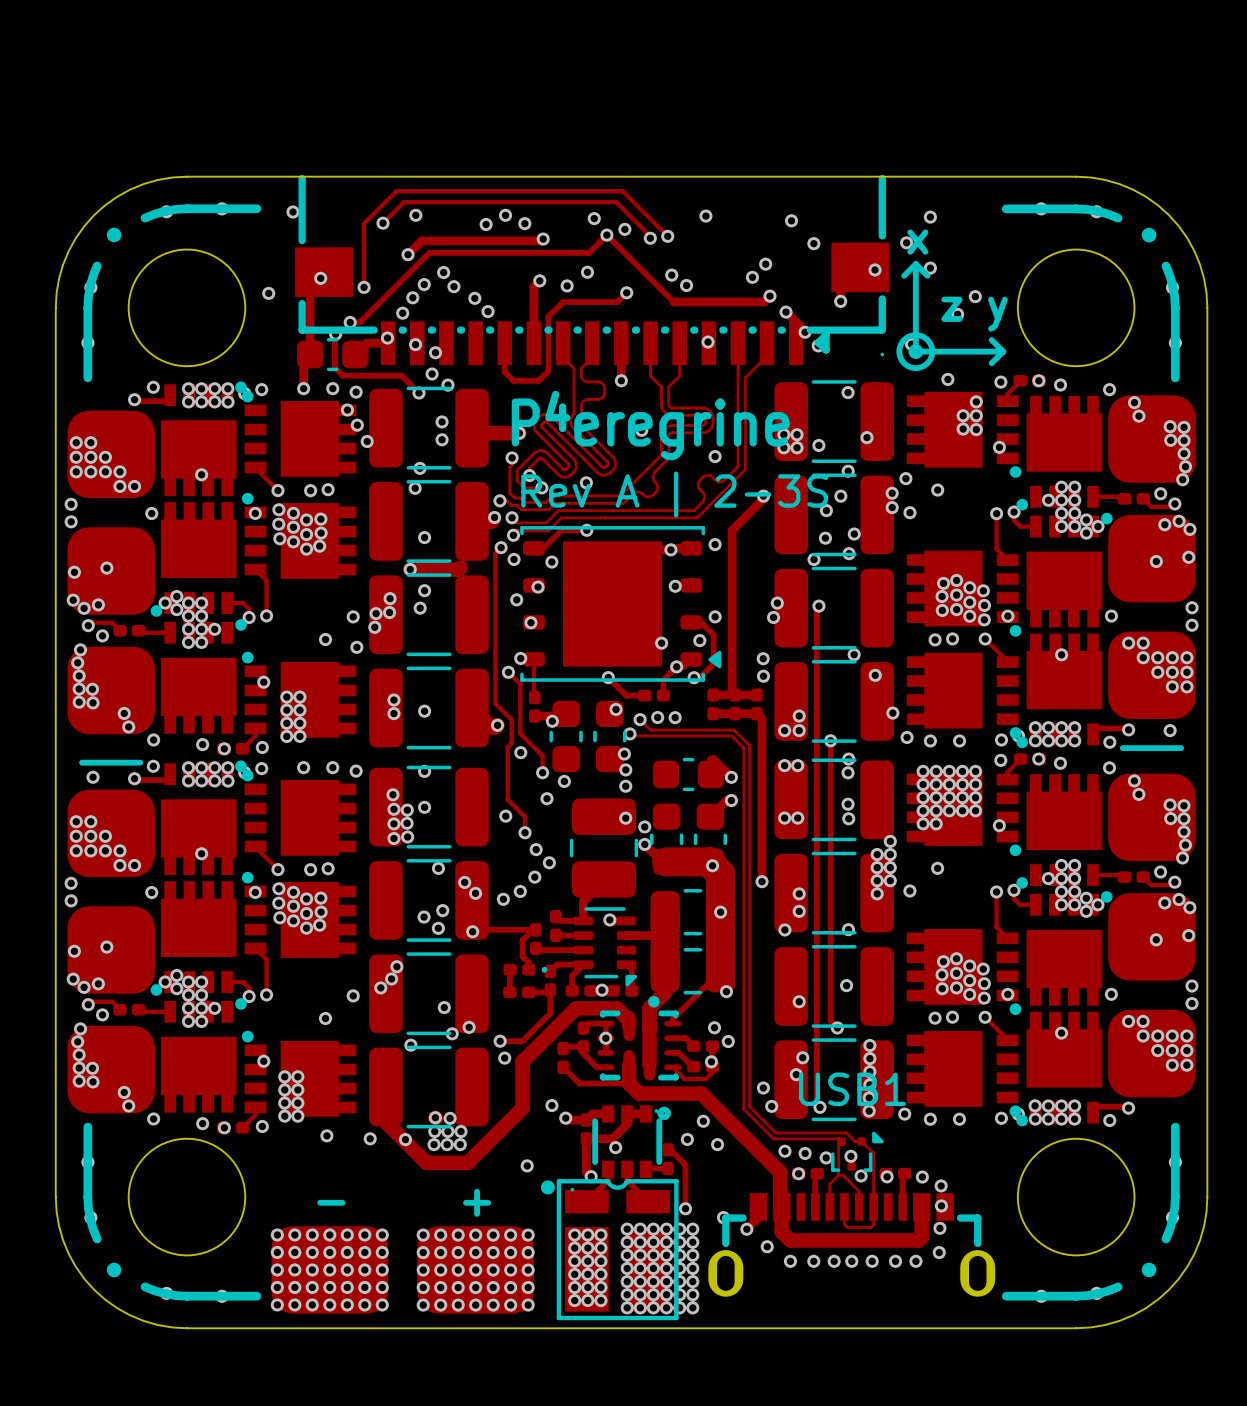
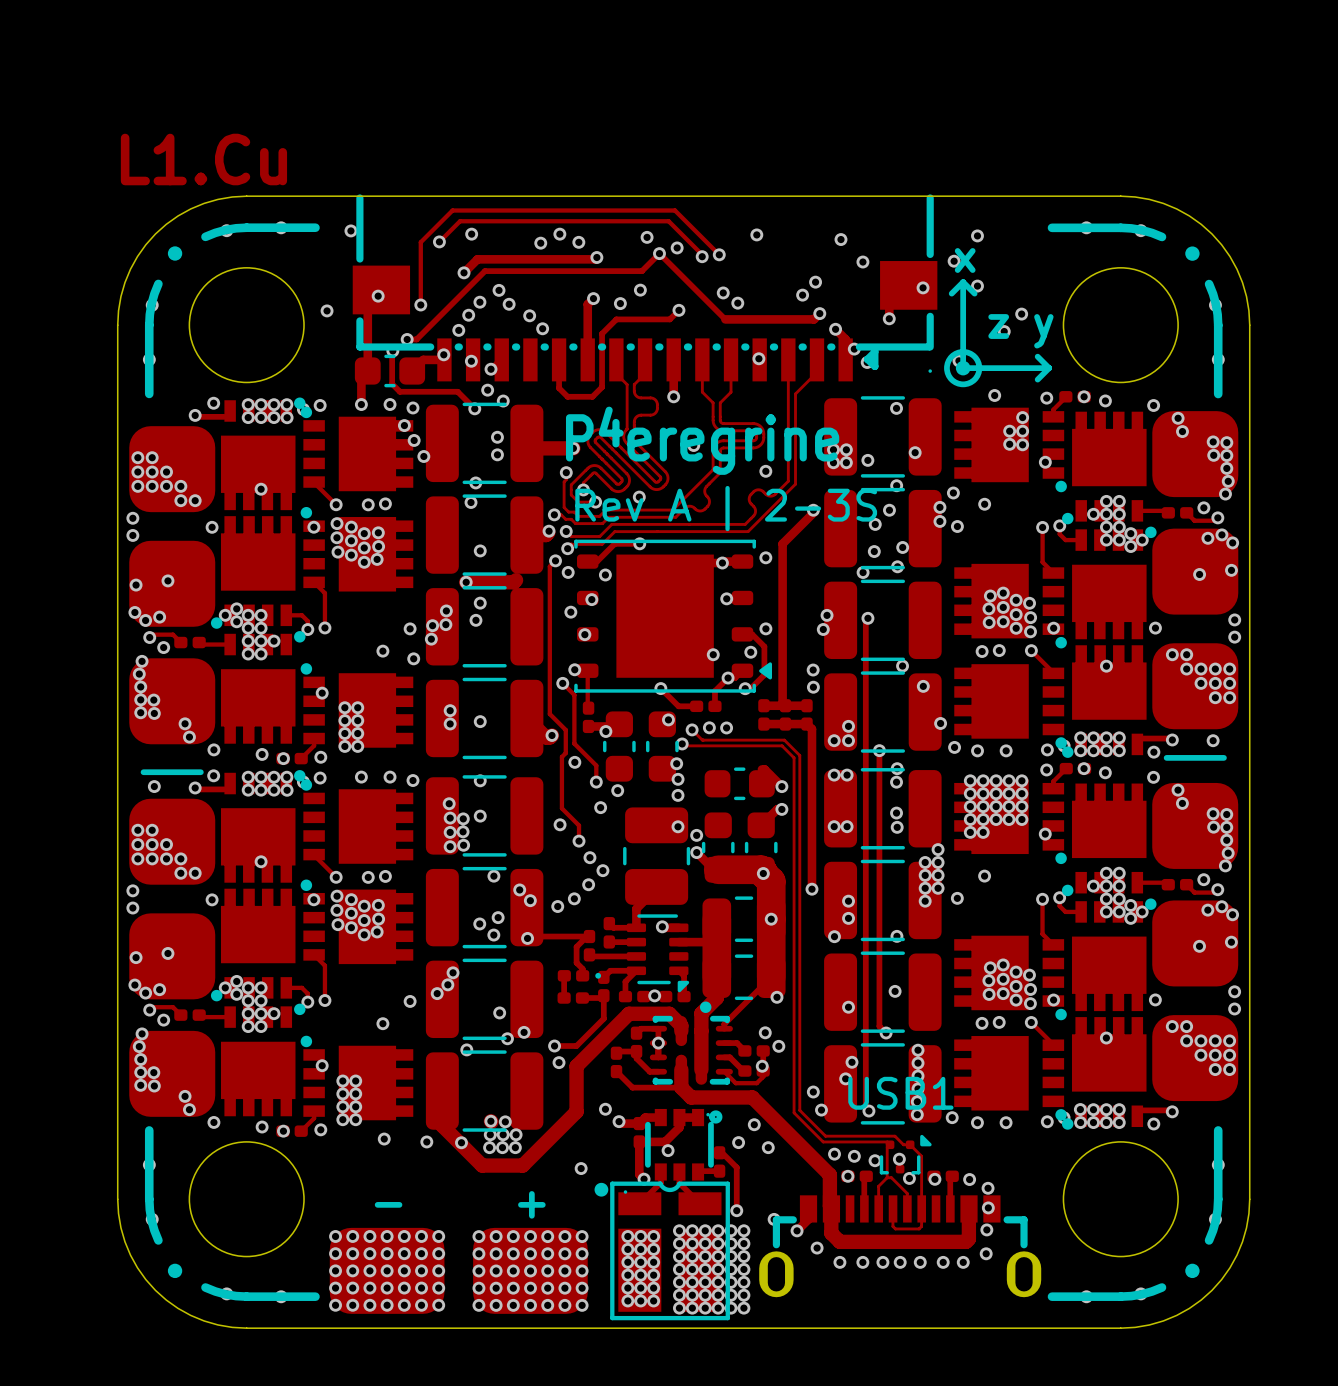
text: none -> L1.Cu (203, 159)

